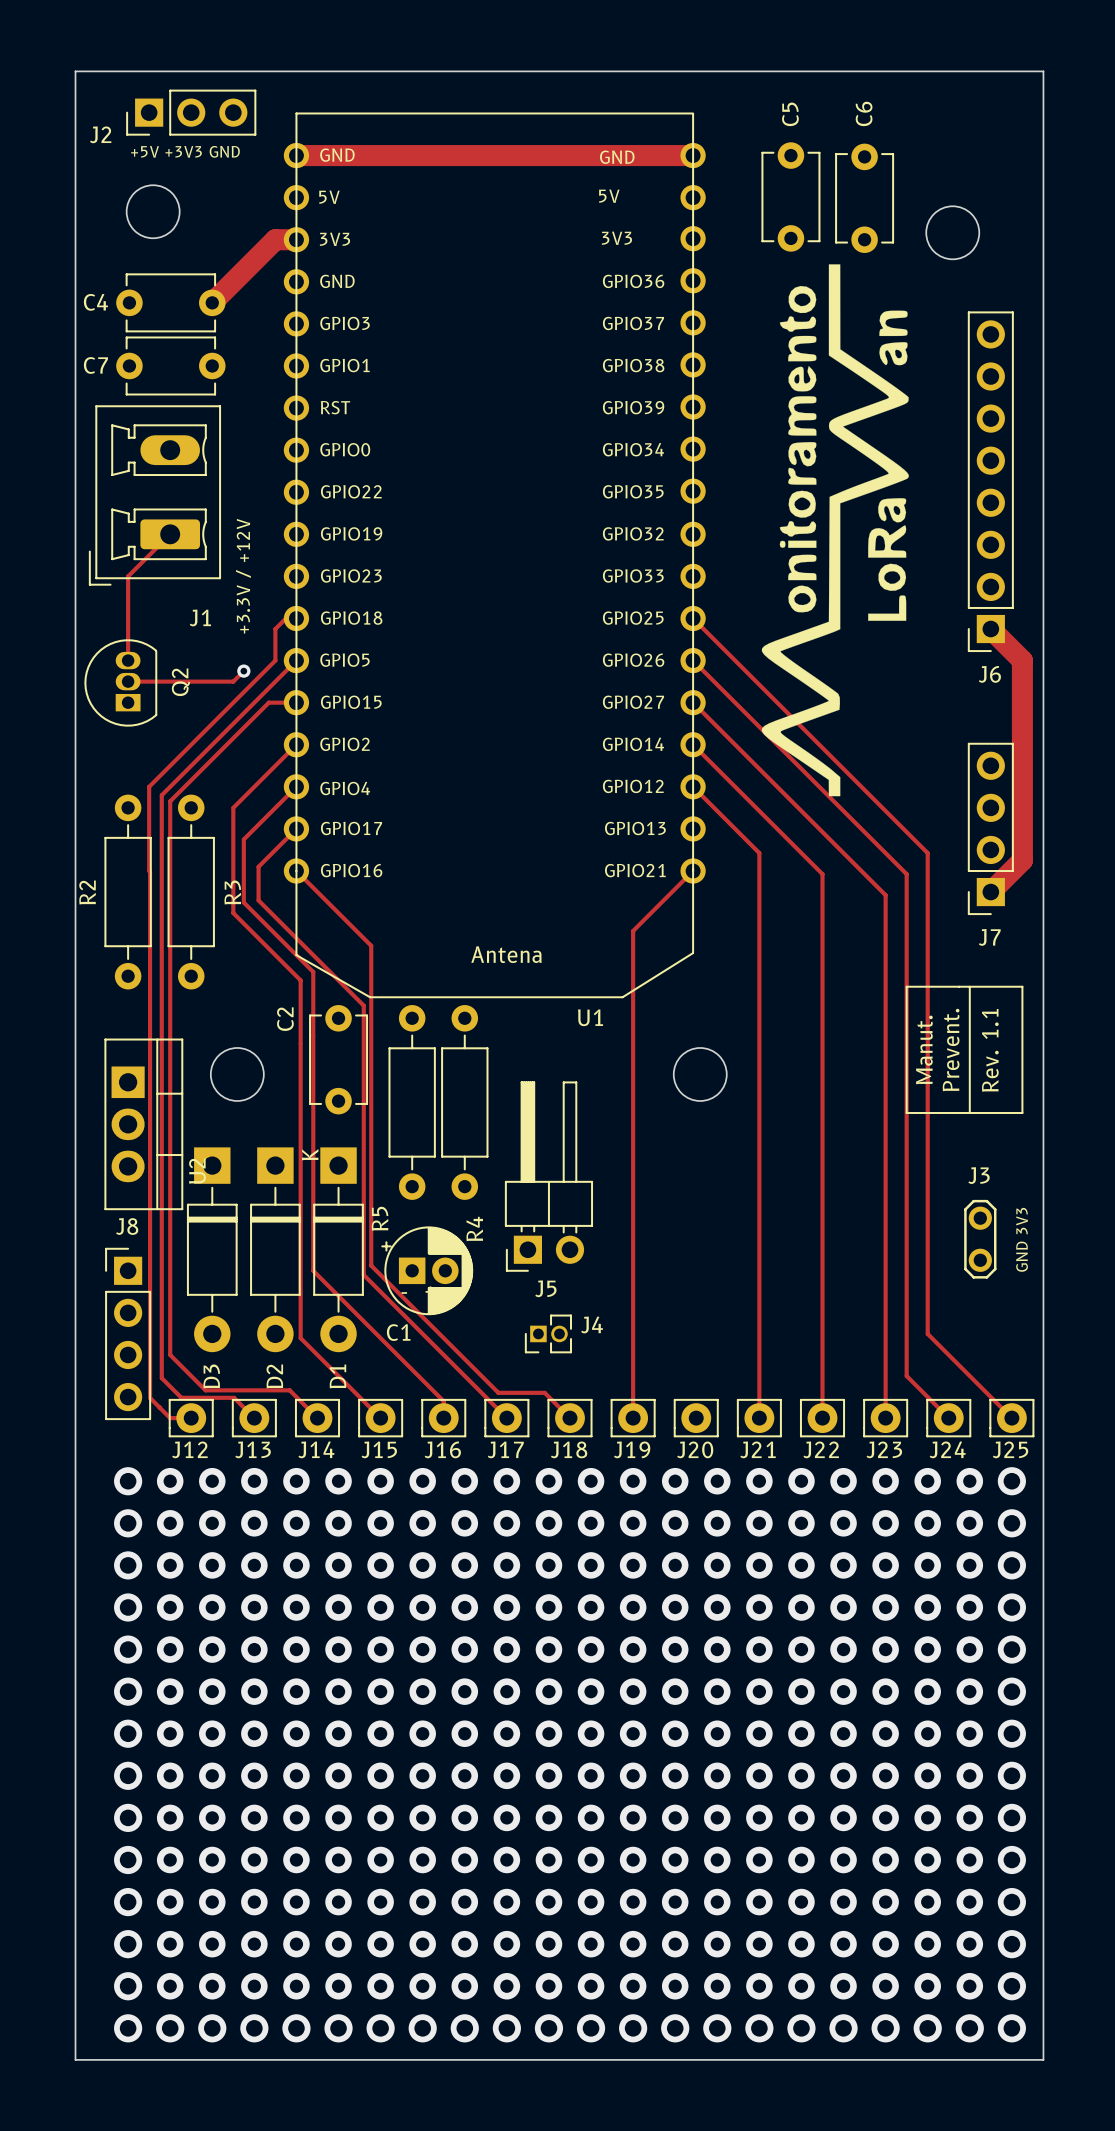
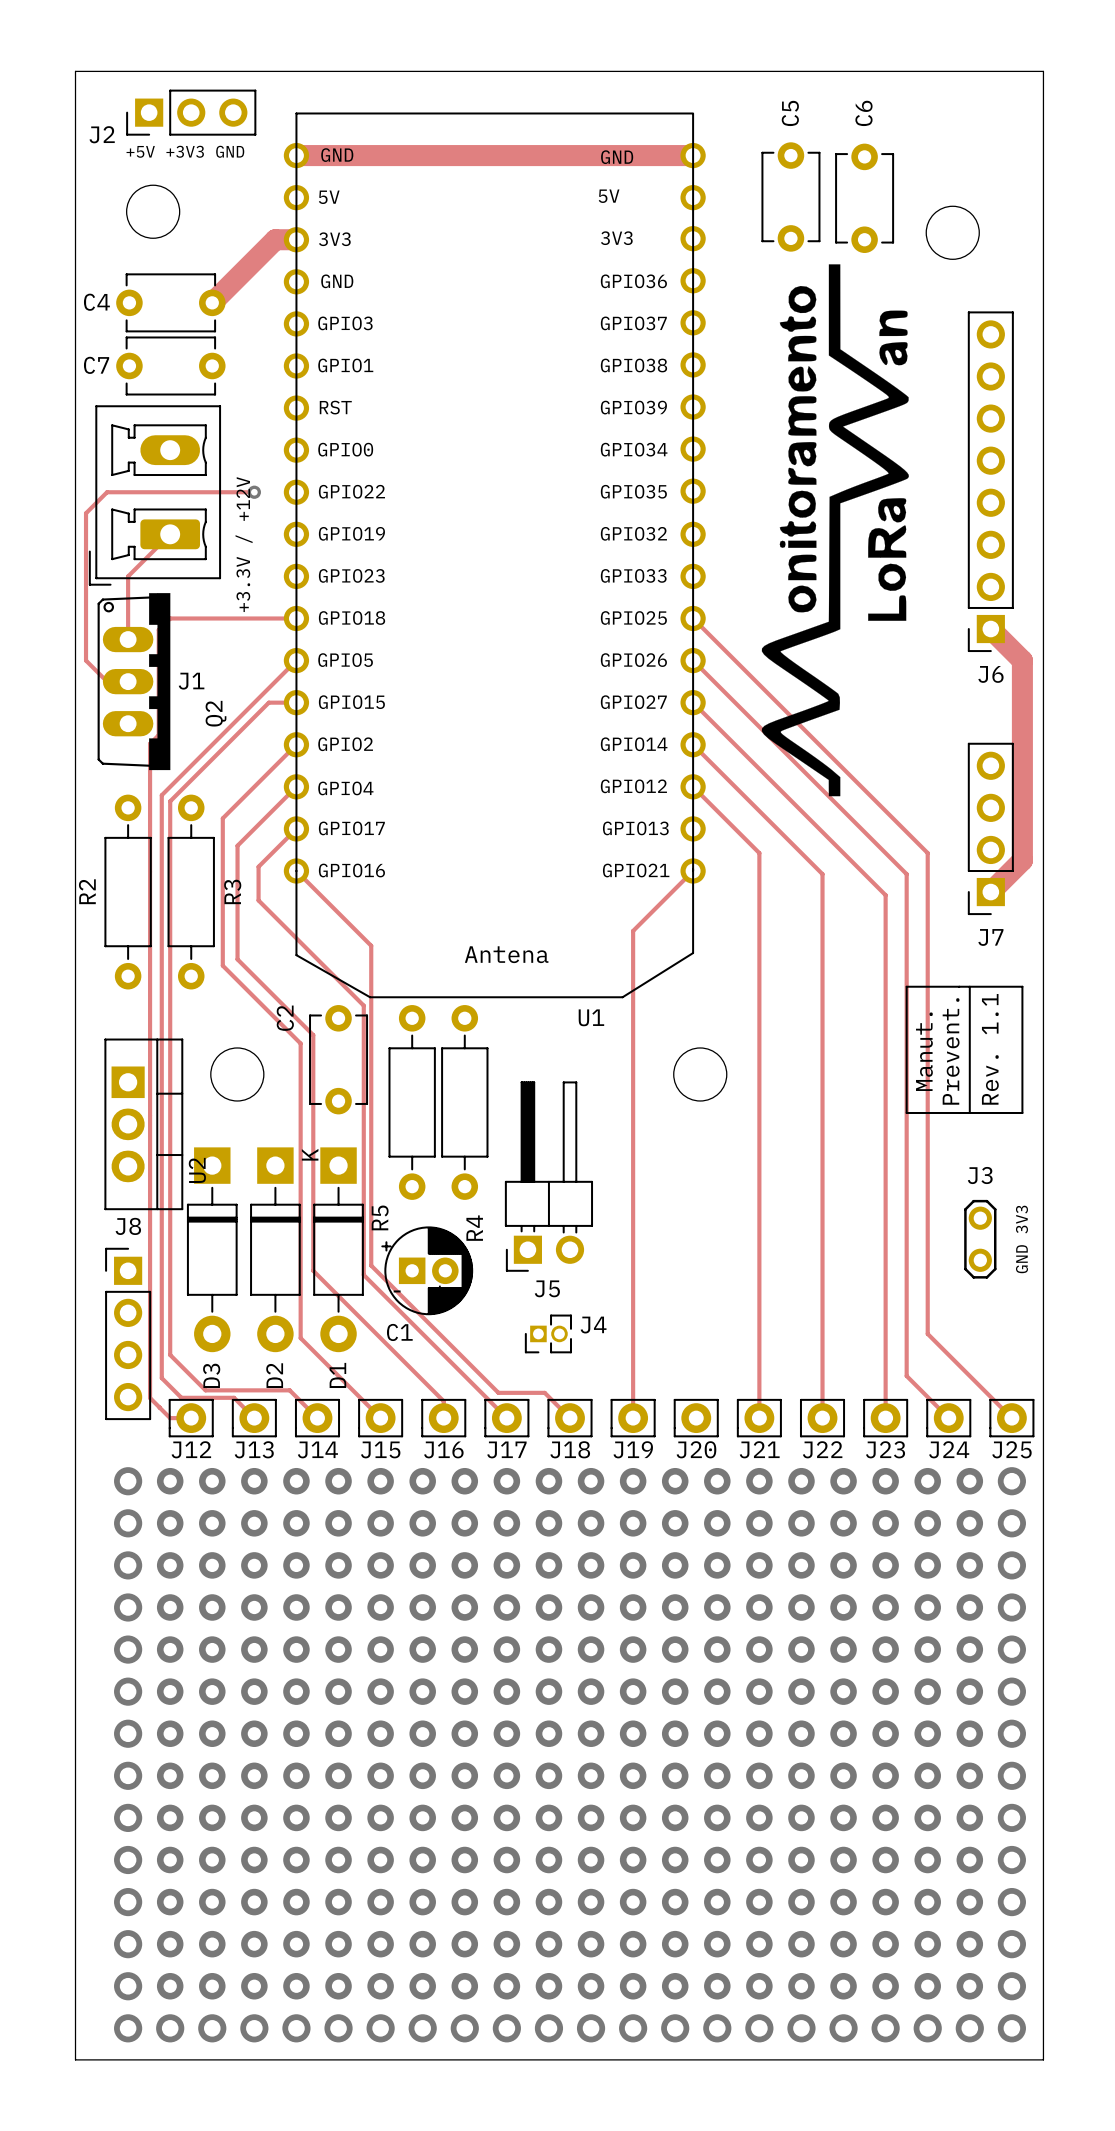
via: none -> (254, 492)
text position: +3.3V / +12V (243, 576) -> +3.3V / +12V (244, 544)
J1 name position: J1 (200, 617) -> J1 (191, 681)
track: (285, 618) (275, 629) (275, 660) (149, 786) (150, 871) -> (285, 618) (170, 618) (158, 629) (158, 735) (150, 743) (150, 871)
Q2 footprint: [84, 639, 158, 727] -> [97, 593, 171, 771]
track: (128, 639) (128, 660) -> none
track: (243, 671) (233, 681) (128, 681) -> (254, 492) (107, 492) (86, 513) (86, 660) (107, 681) (128, 681)
via: (243, 671) -> none
Q2 name position: Q2 (180, 682) -> Q2 (215, 713)
track: (233, 807) (233, 913) (300, 980) (300, 1043) -> (233, 807) (222, 818) (222, 965) (300, 1043)
track: (243, 839) (243, 902) (313, 972) (313, 1035) -> (243, 839) (237, 845) (237, 959) (313, 1035)

